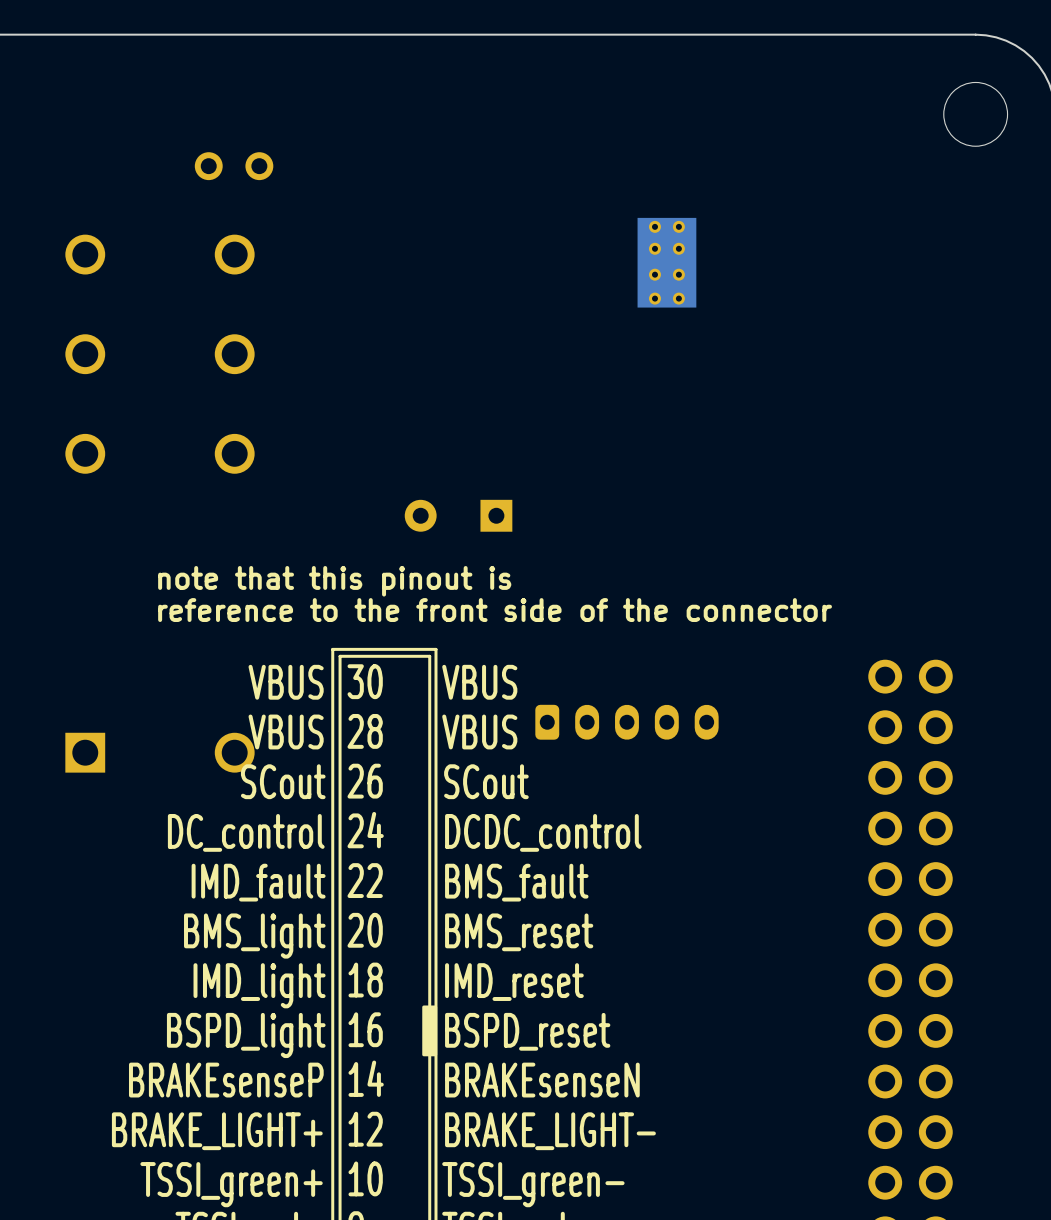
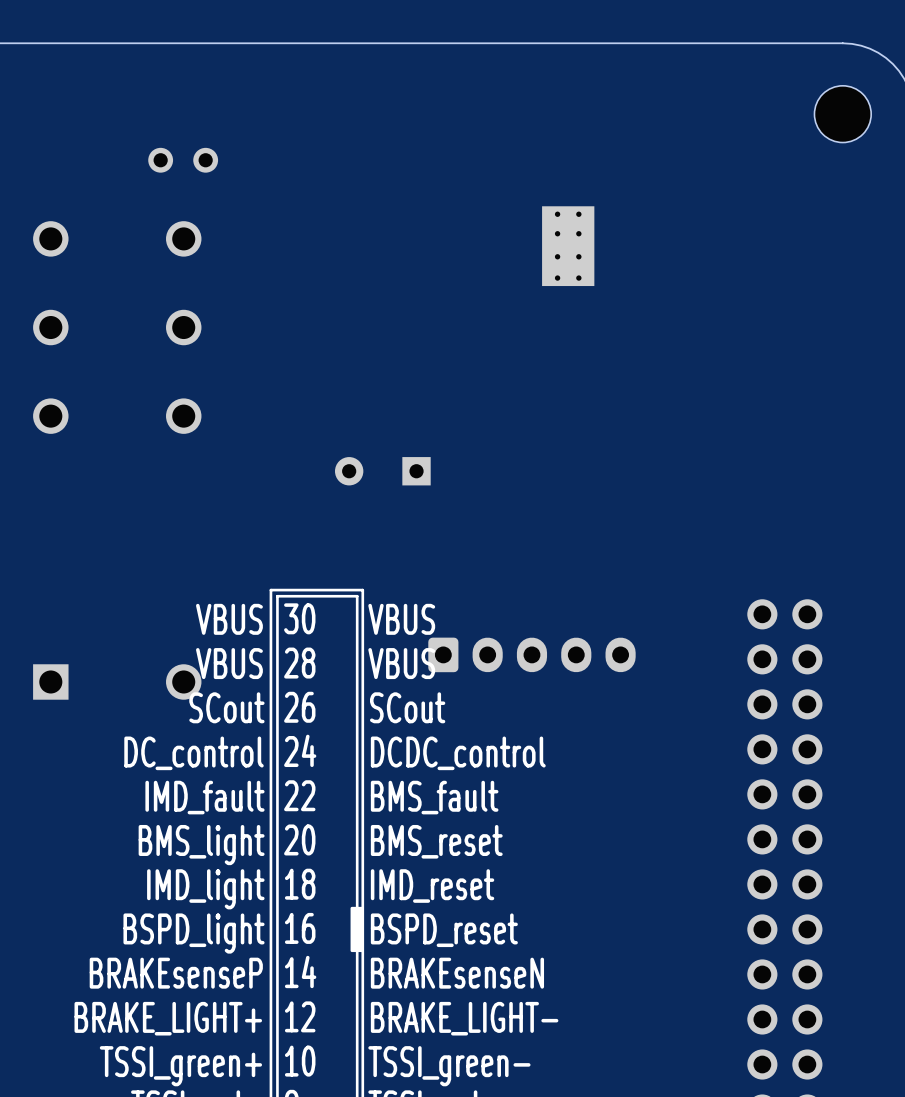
text: note that this pinout is (334, 581) -> none
text: reference to the front side of the connector (495, 610) -> none
part footprint: [535, 704, 719, 740] -> [428, 637, 636, 673]

